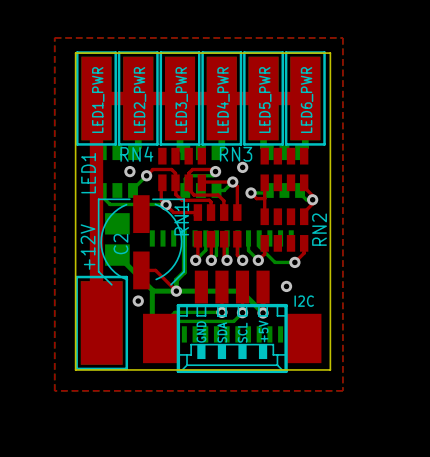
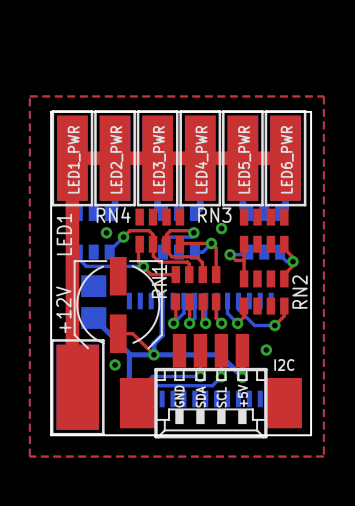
C2 name: C2 (120, 244) -> none

